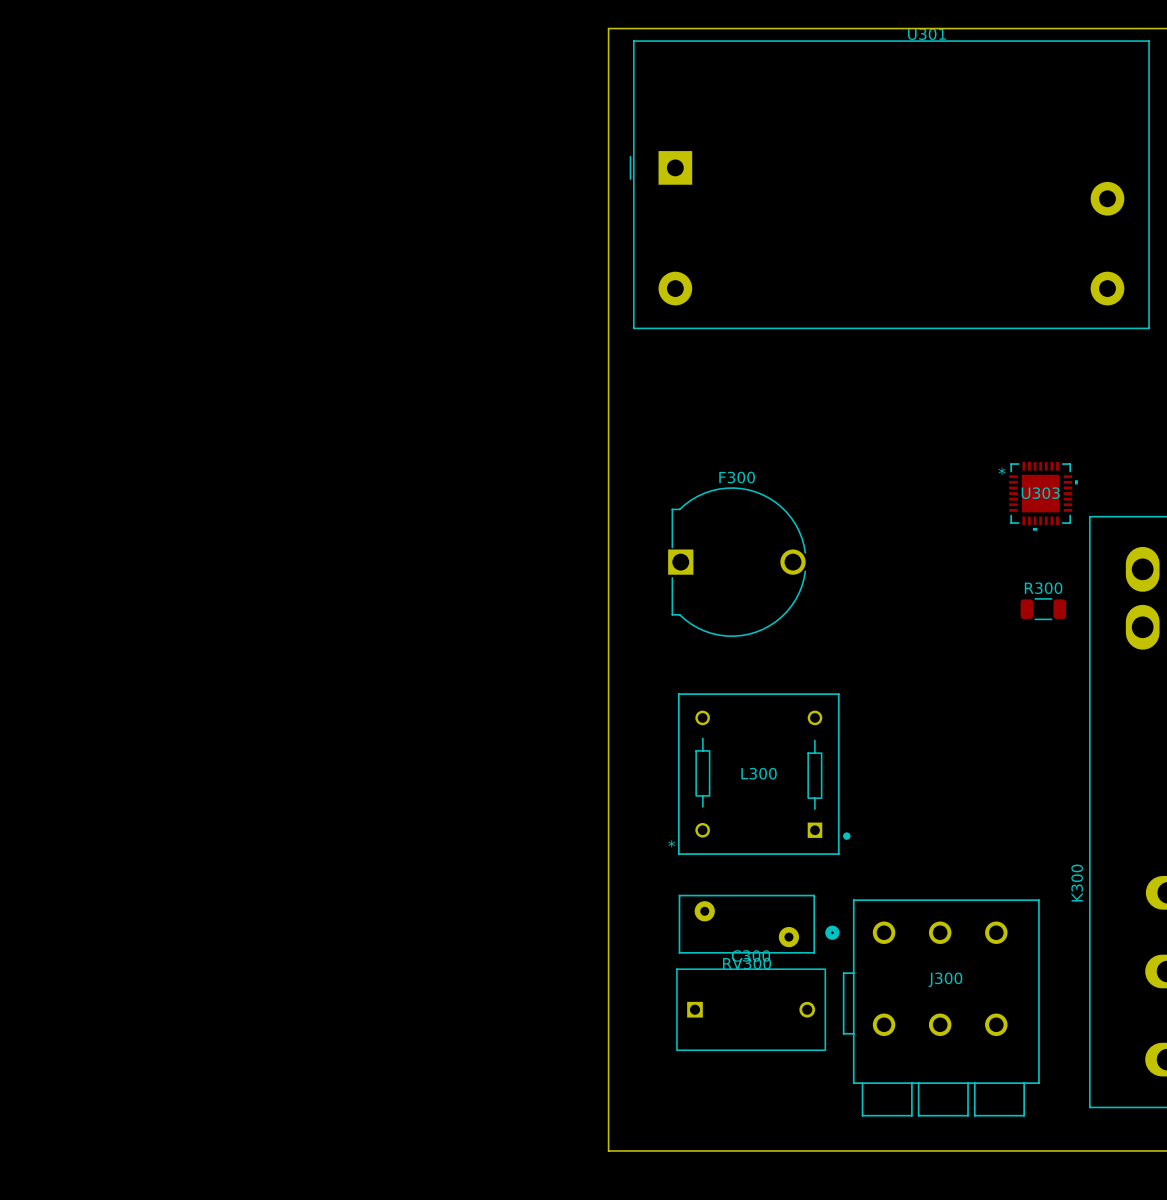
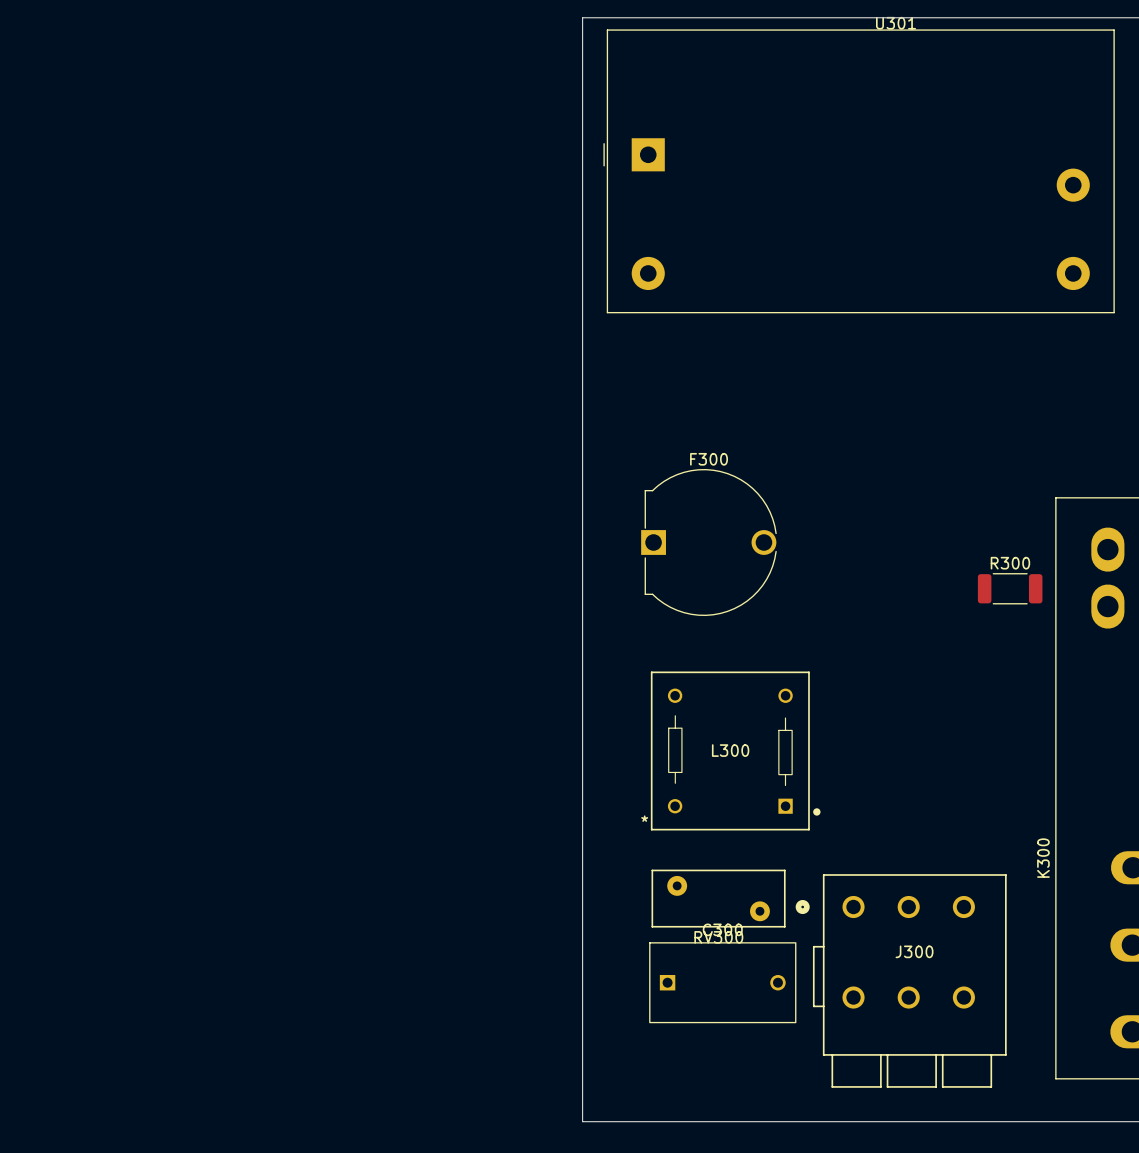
U303: (1043, 496) -> none
R300 footprint: [1020, 598, 1067, 621] -> [977, 573, 1043, 605]

